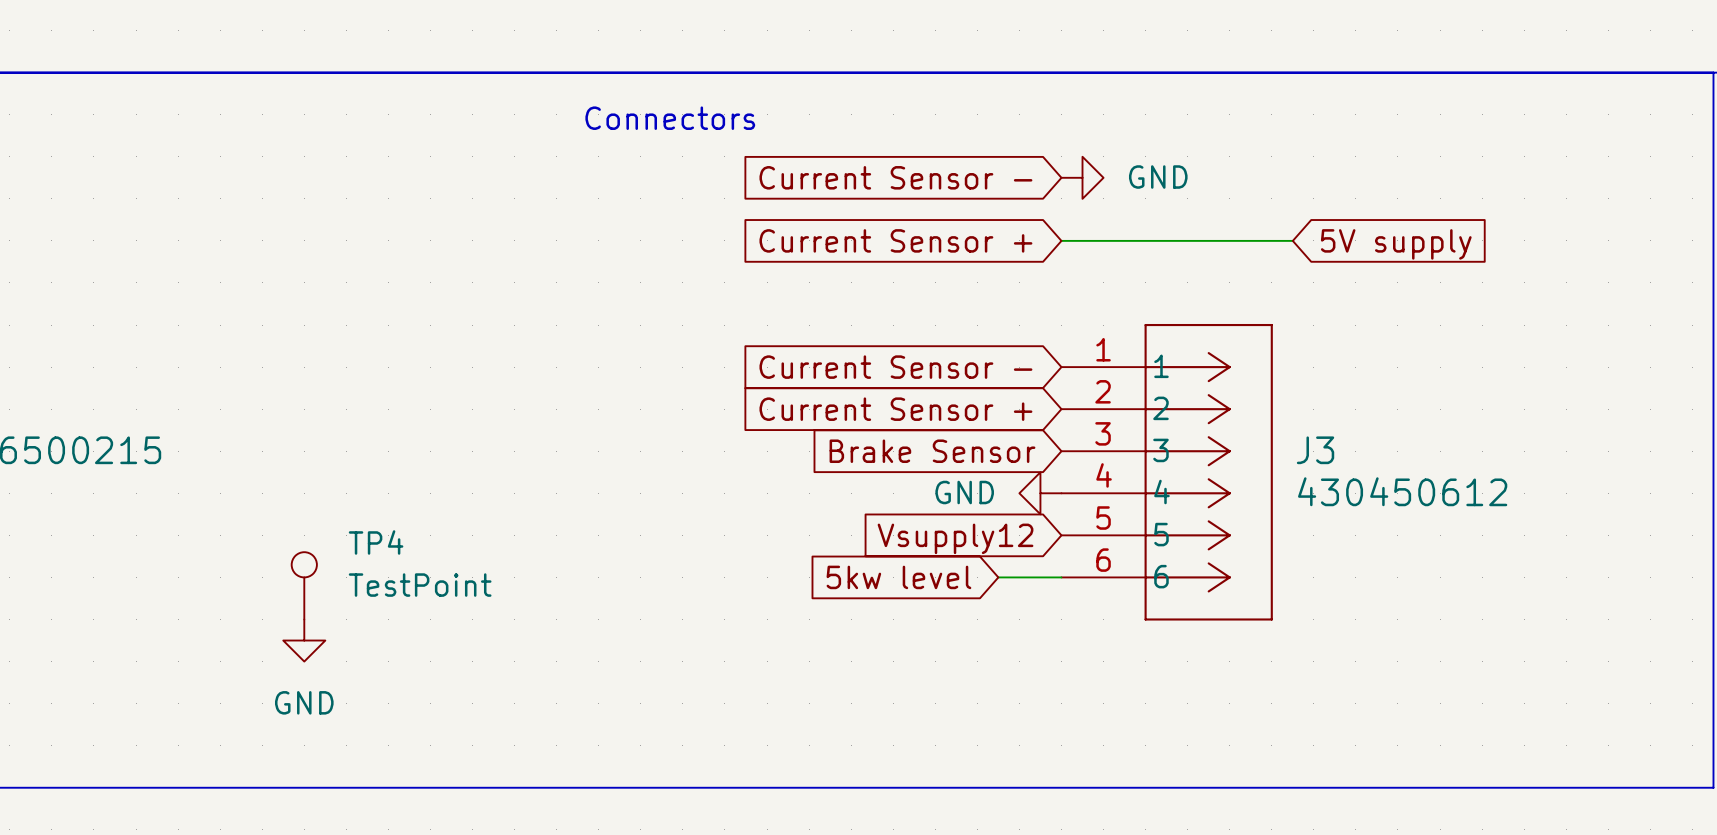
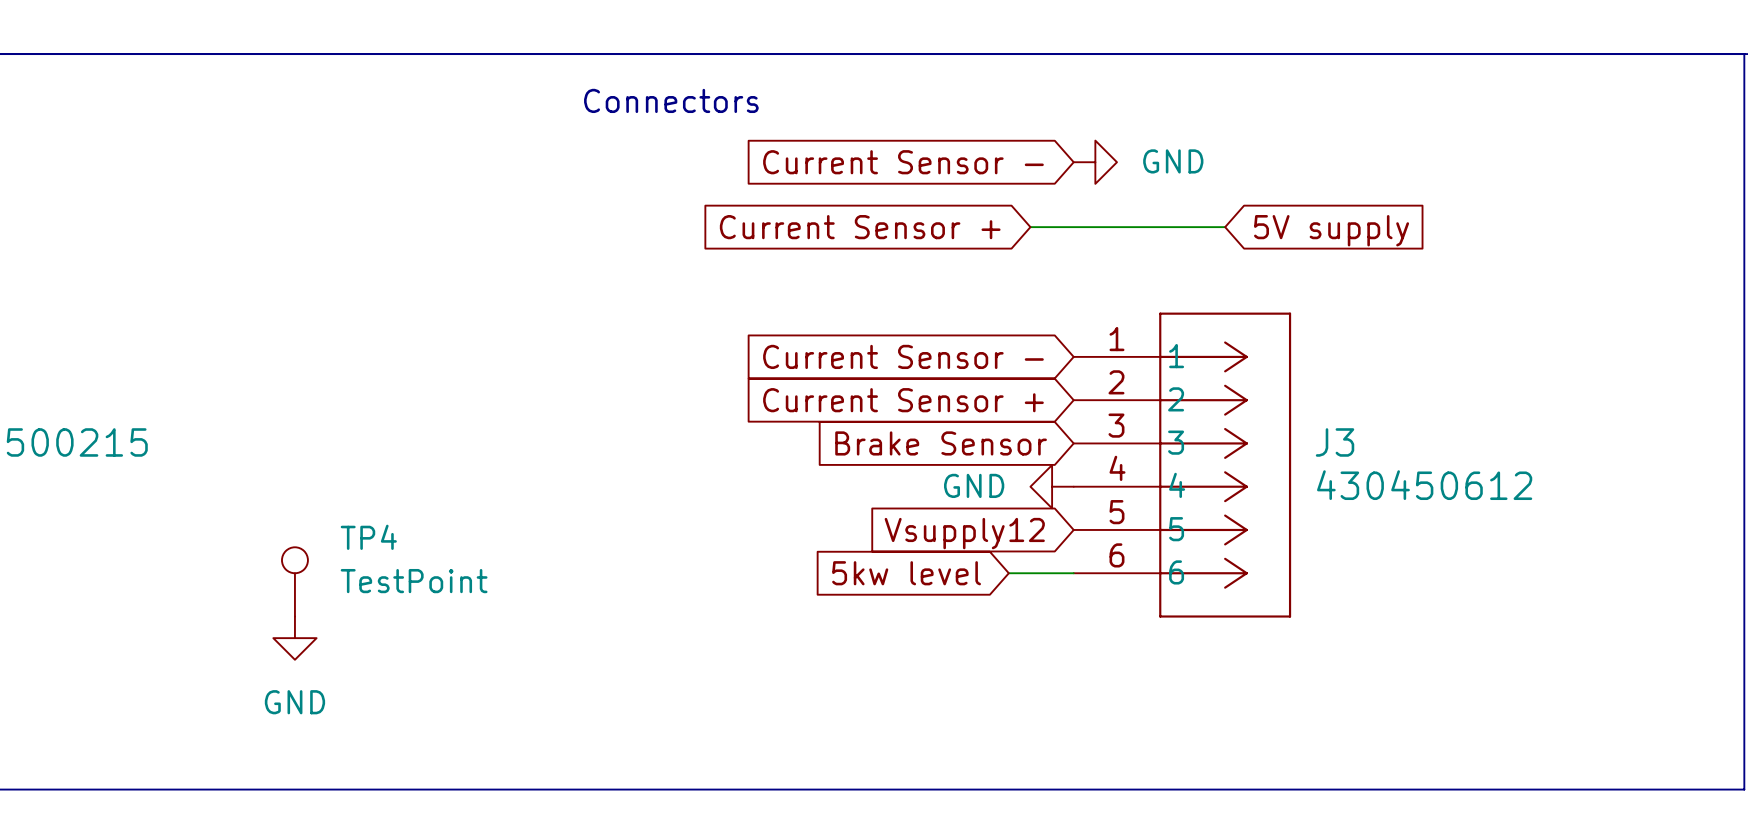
global label position: Current Sensor + (895, 240) -> Current Sensor + (860, 227)
wire: none -> (1030, 227) (1073, 227)
wire: (1208, 240) (1292, 240) -> none
global label position: 5V supply (1396, 244) -> 5V supply (1331, 230)

